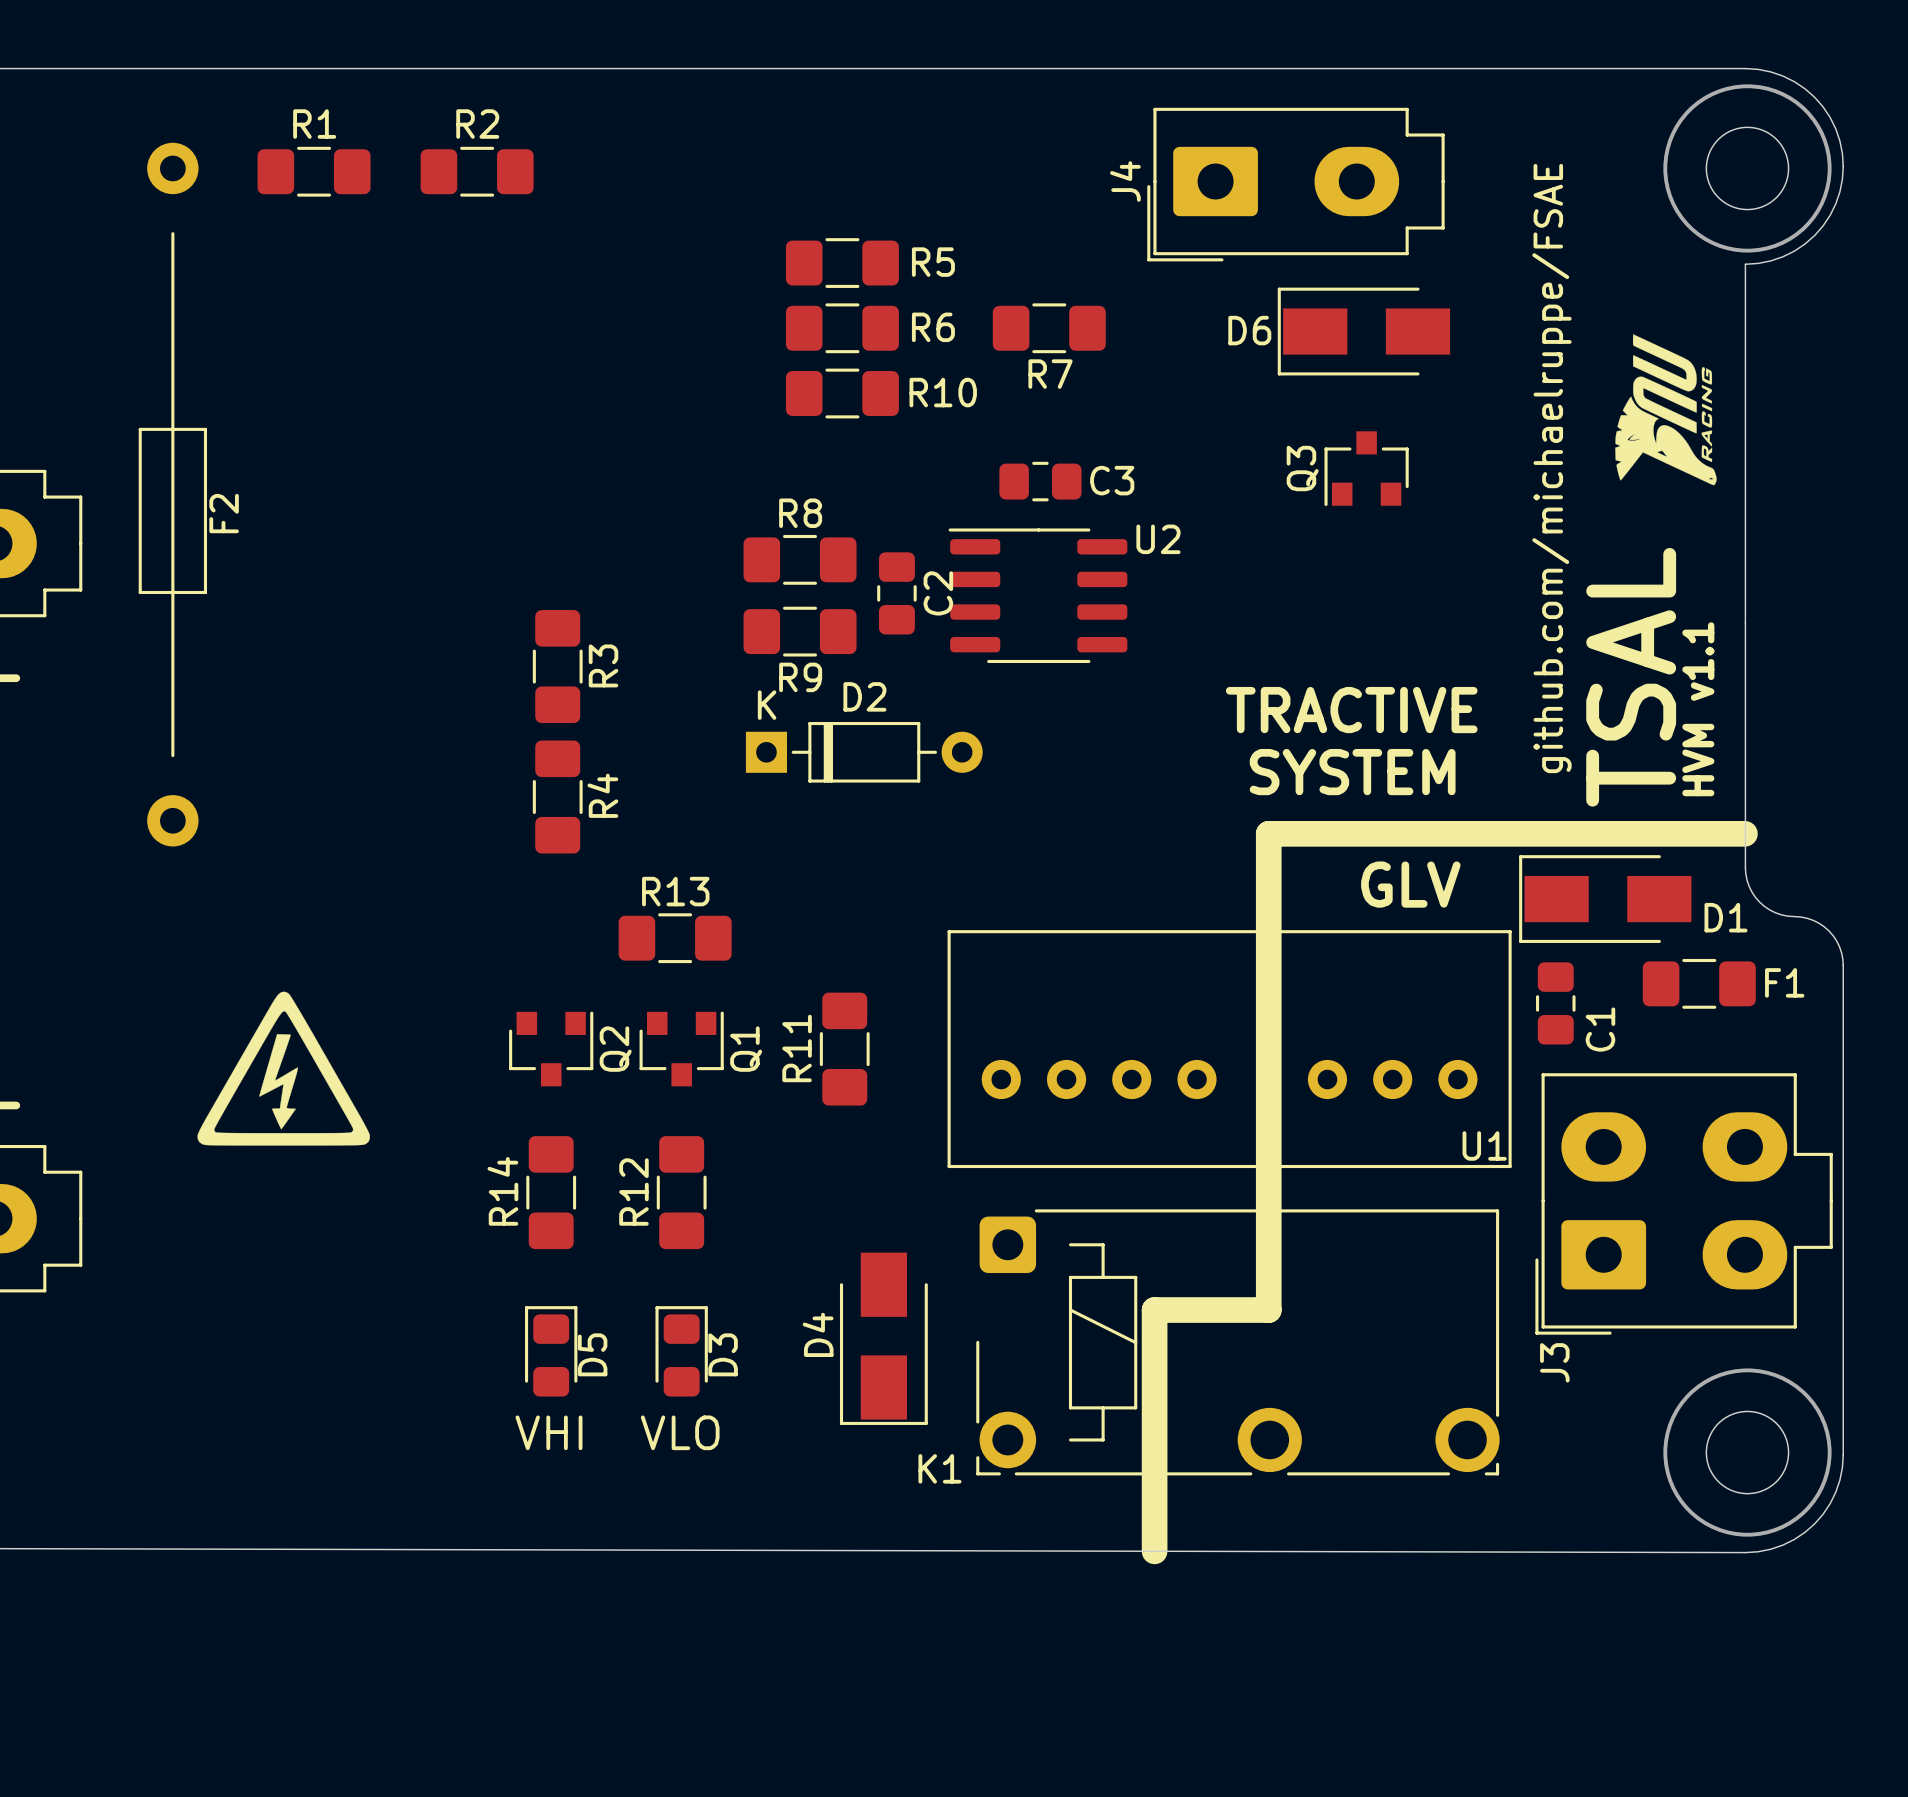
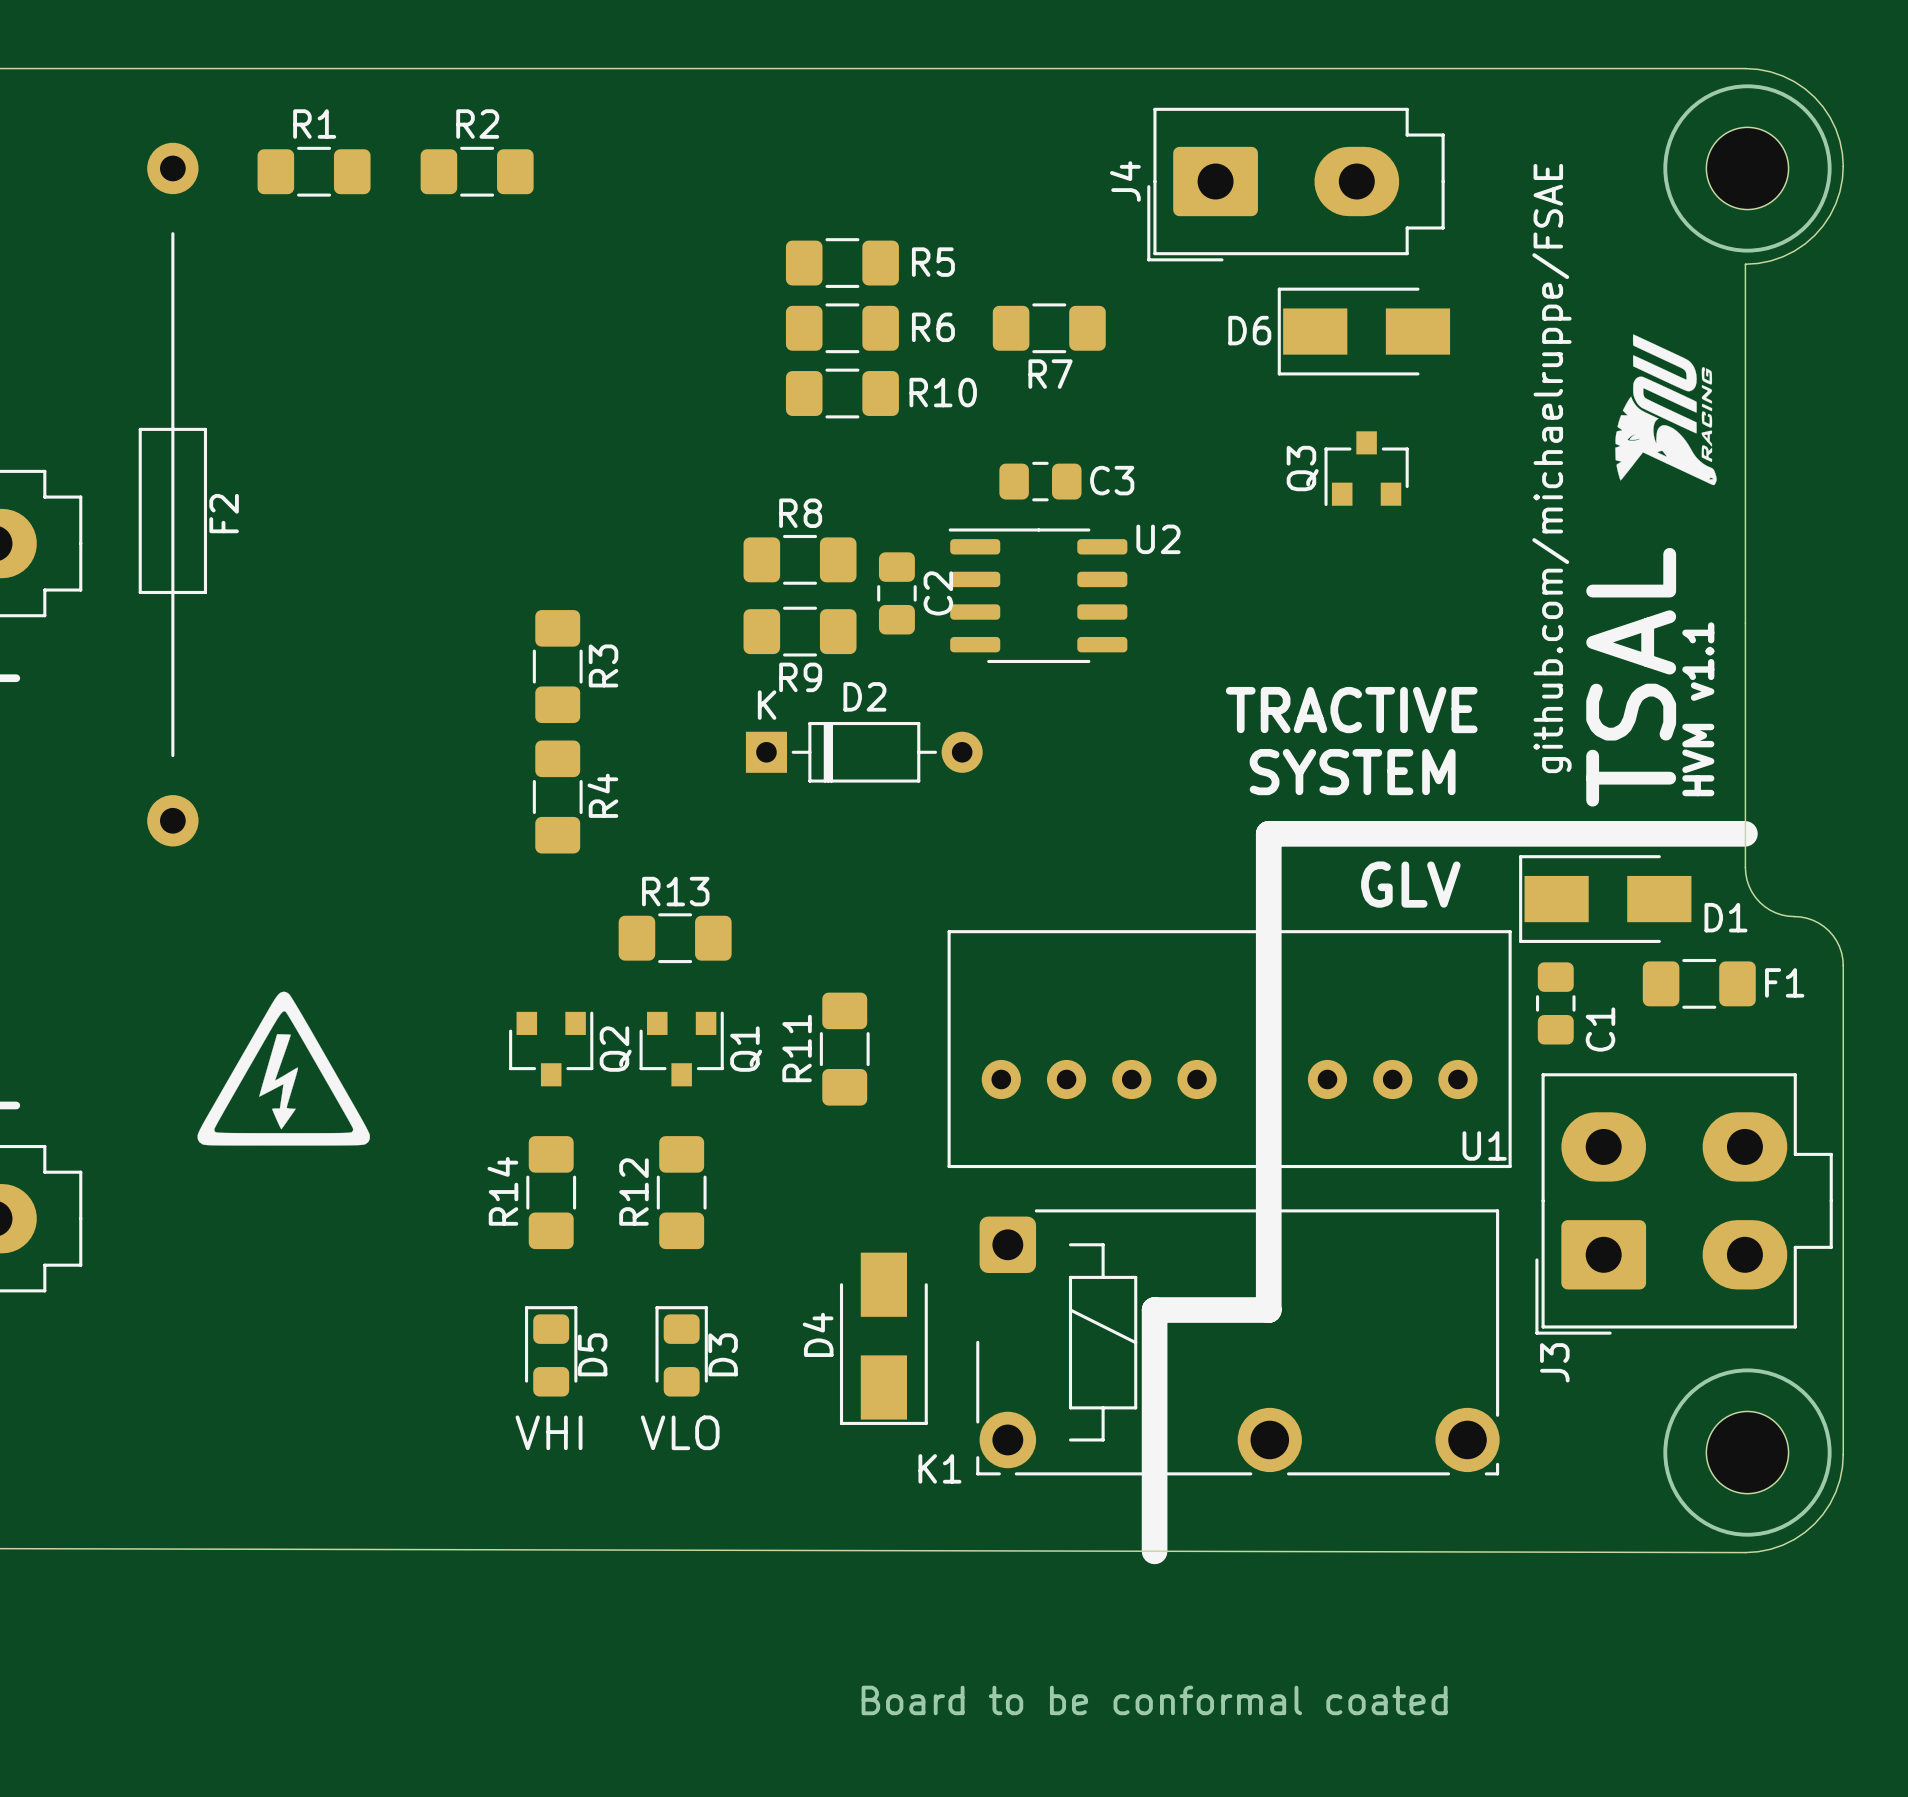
text: none -> Board to be conformal coated (1154, 1700)

